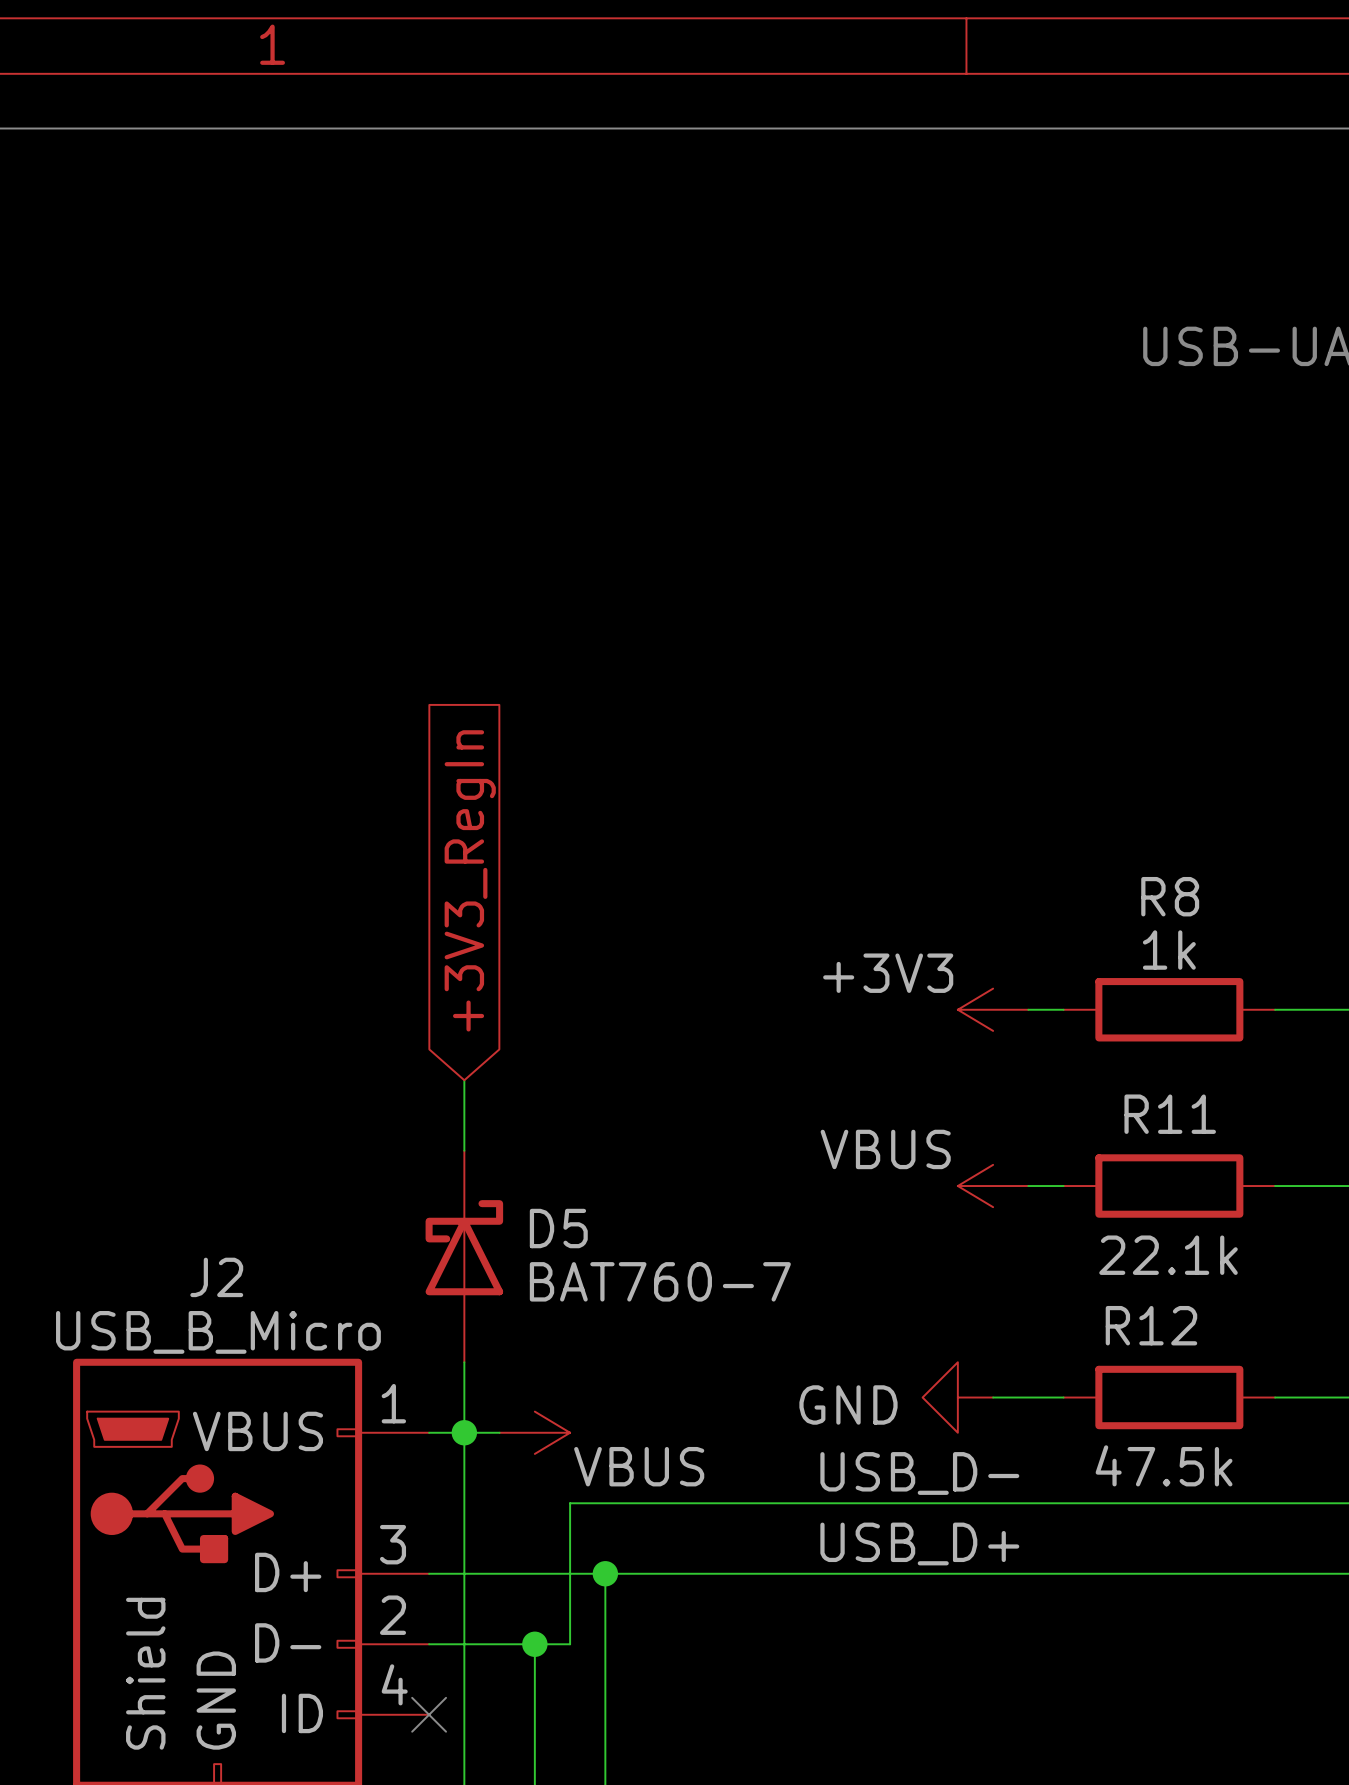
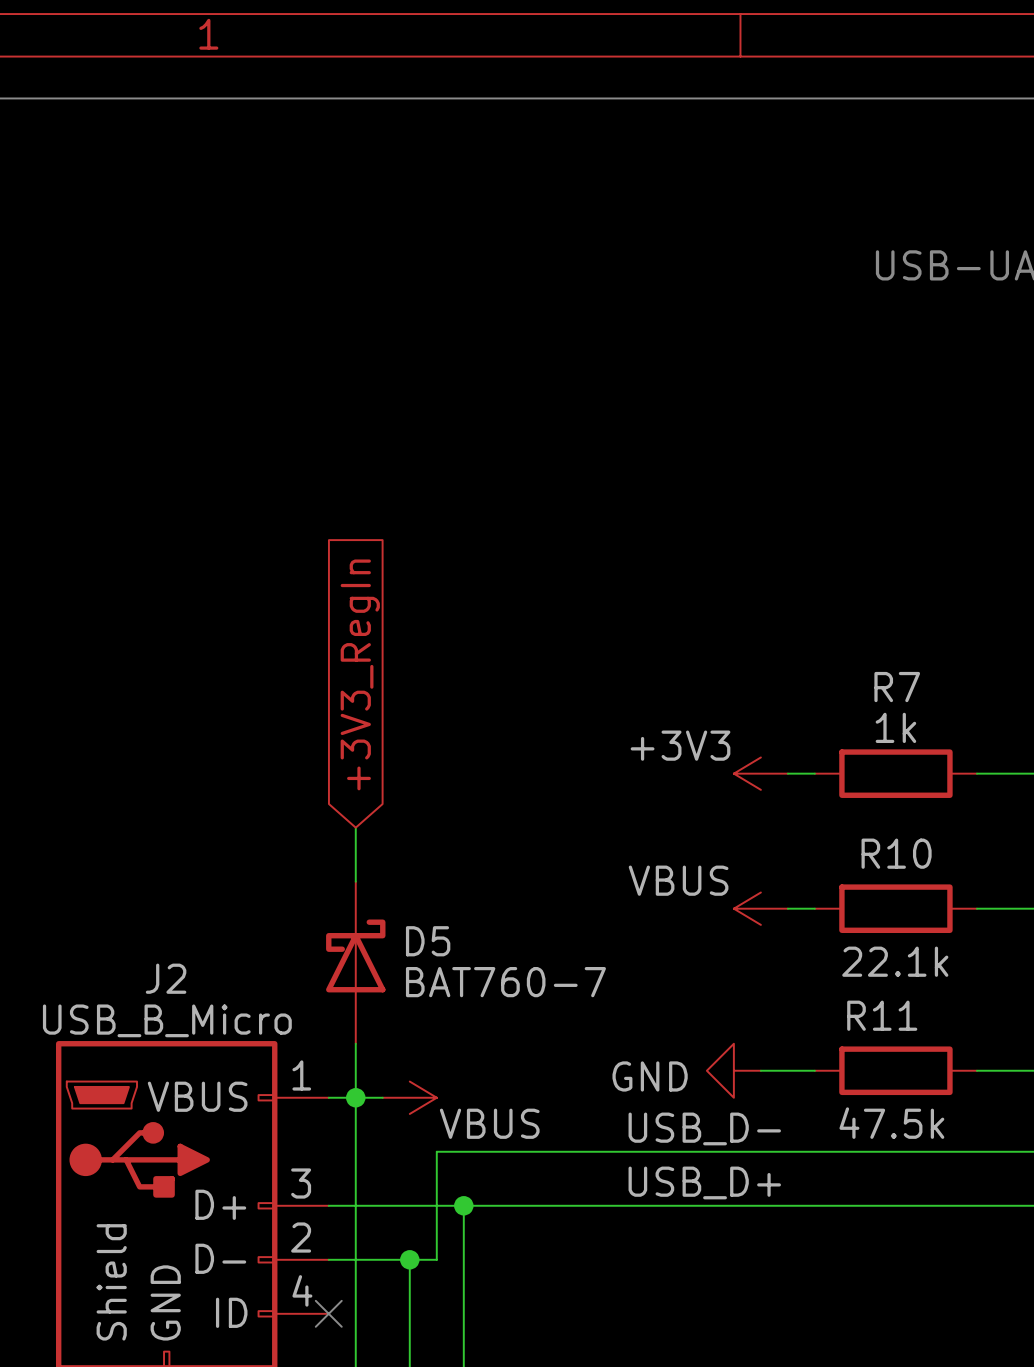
R8 name: R8 (1170, 896) -> R7 (897, 687)
R11 name: R11 (1170, 1114) -> R10 (896, 853)
R12 name: R12 (1151, 1325) -> R11 (882, 1015)

